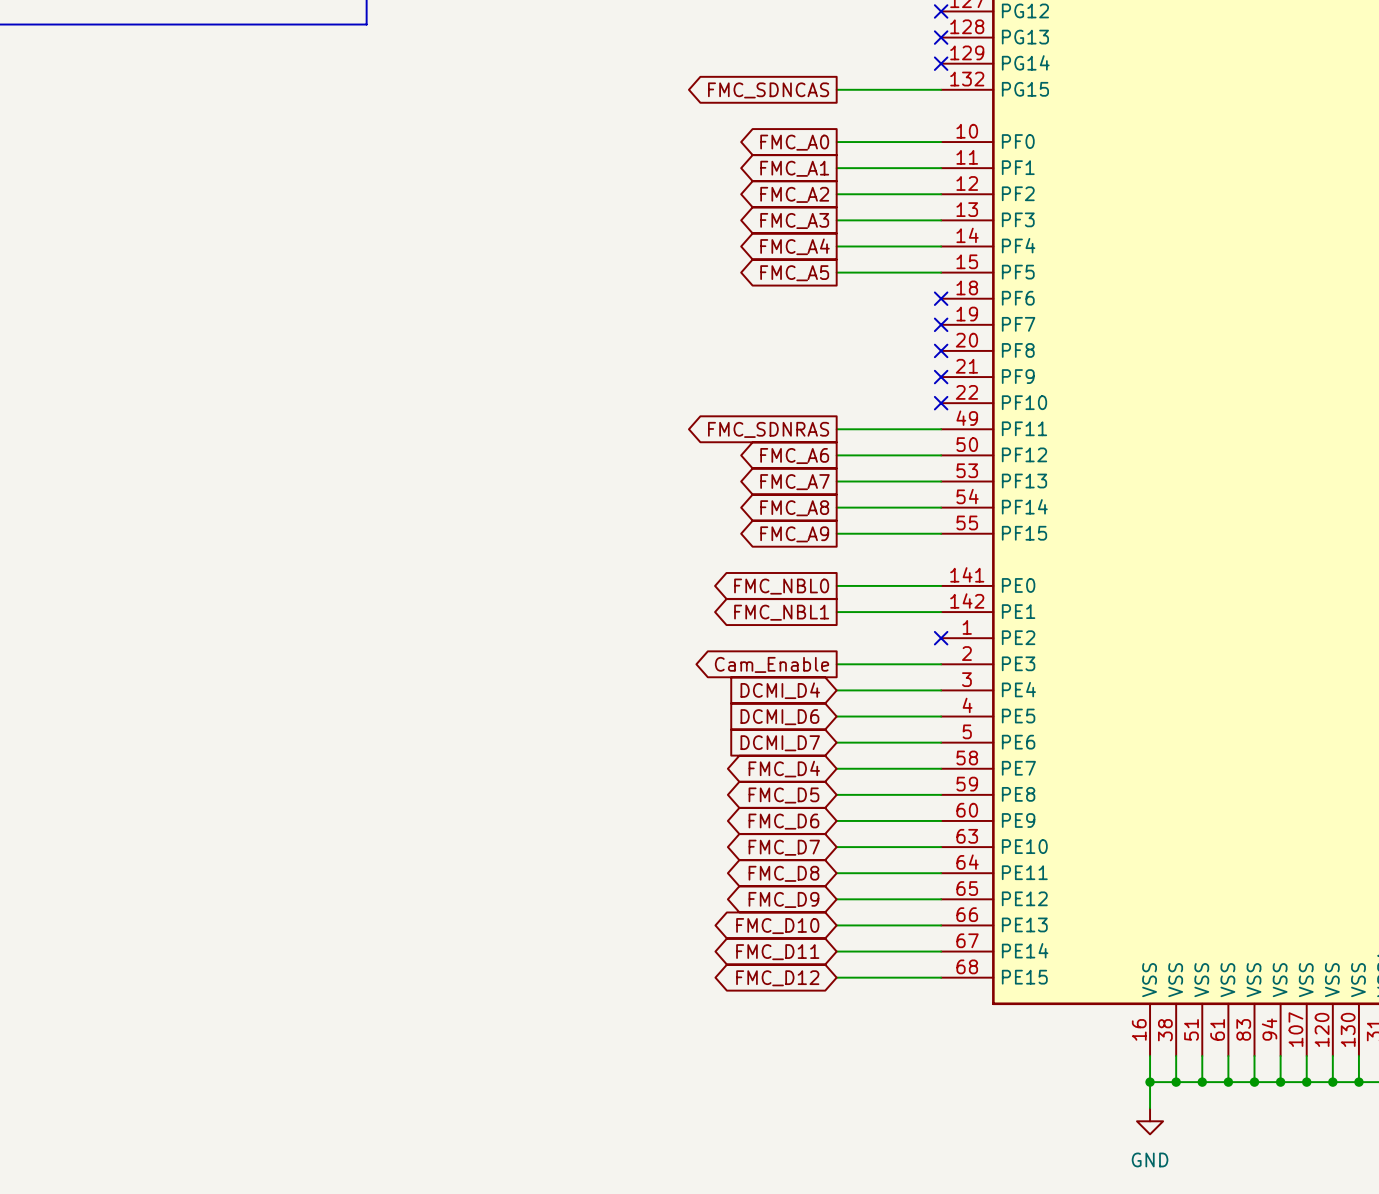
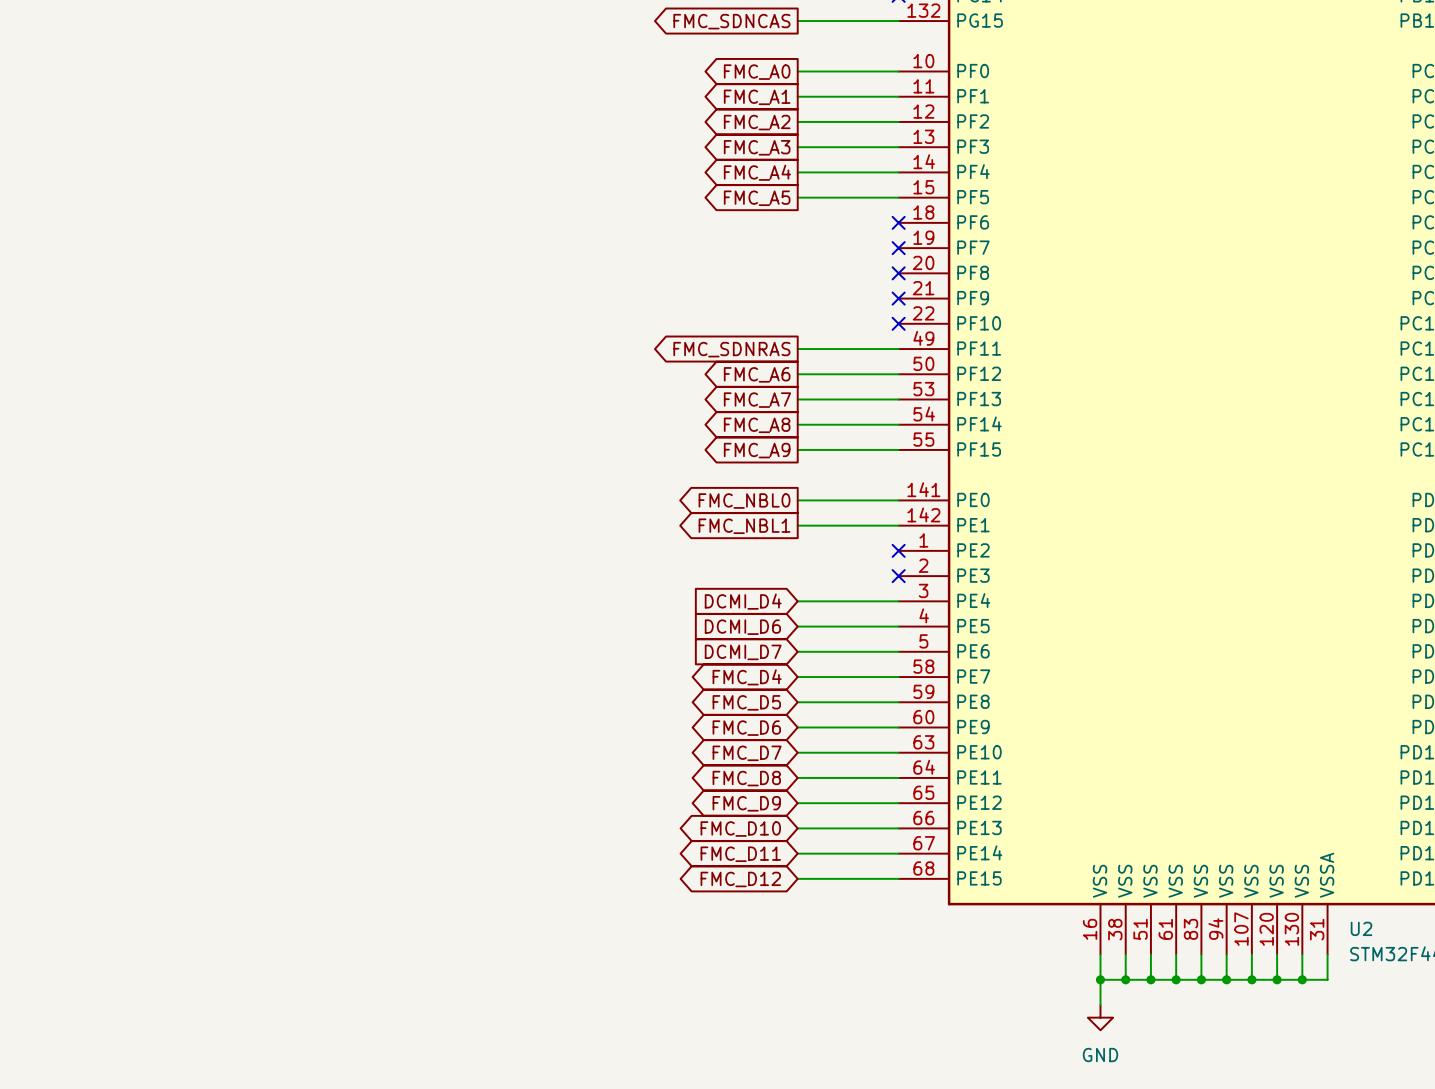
global label: Cam_Enable (772, 664) -> none
wire: (836, 664) (941, 664) -> none
no-connect mark: none -> (898, 576)

